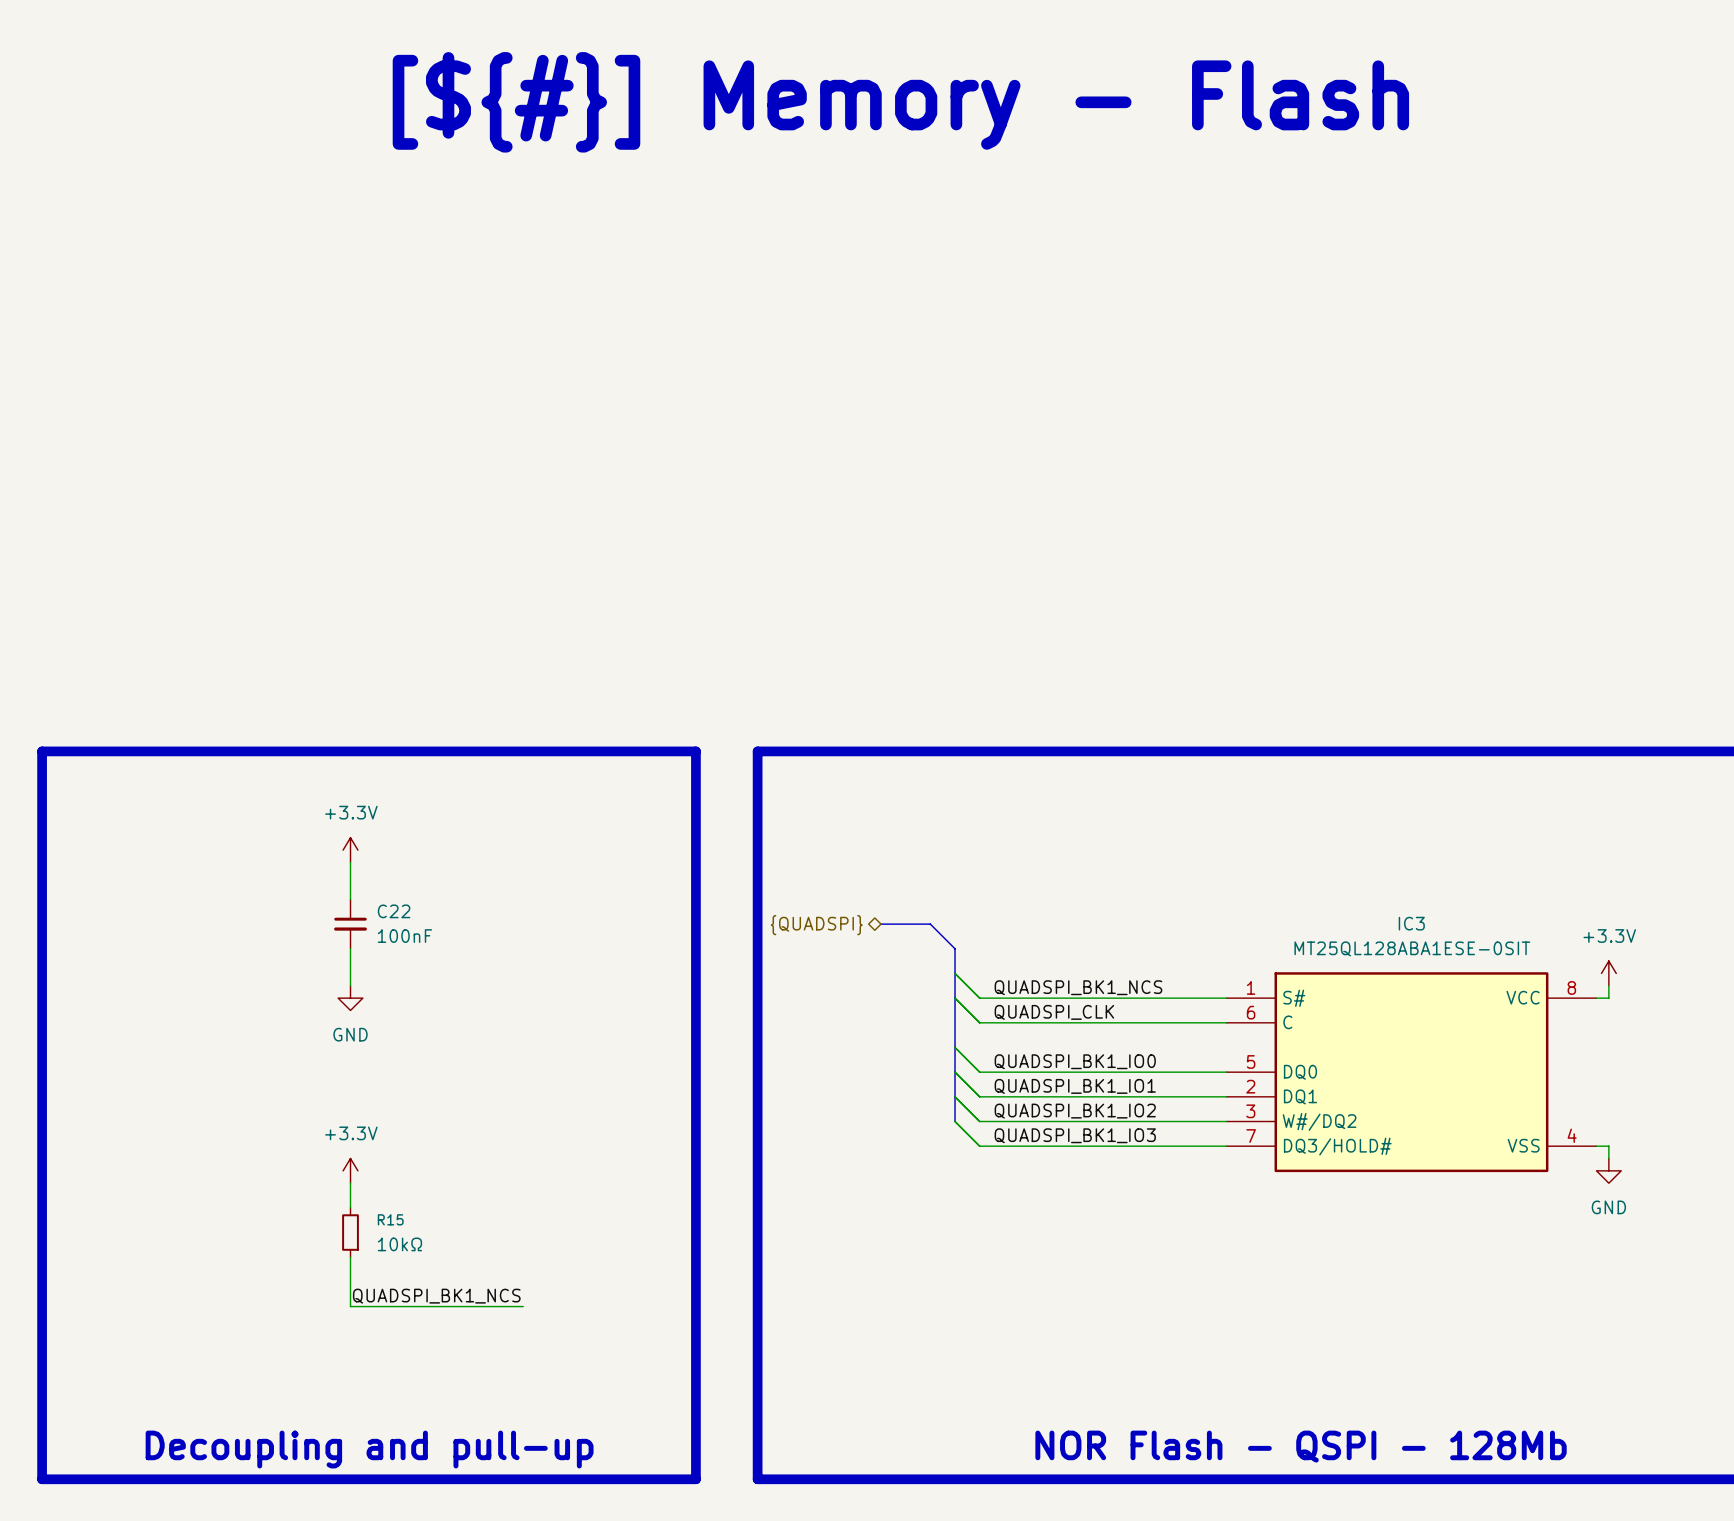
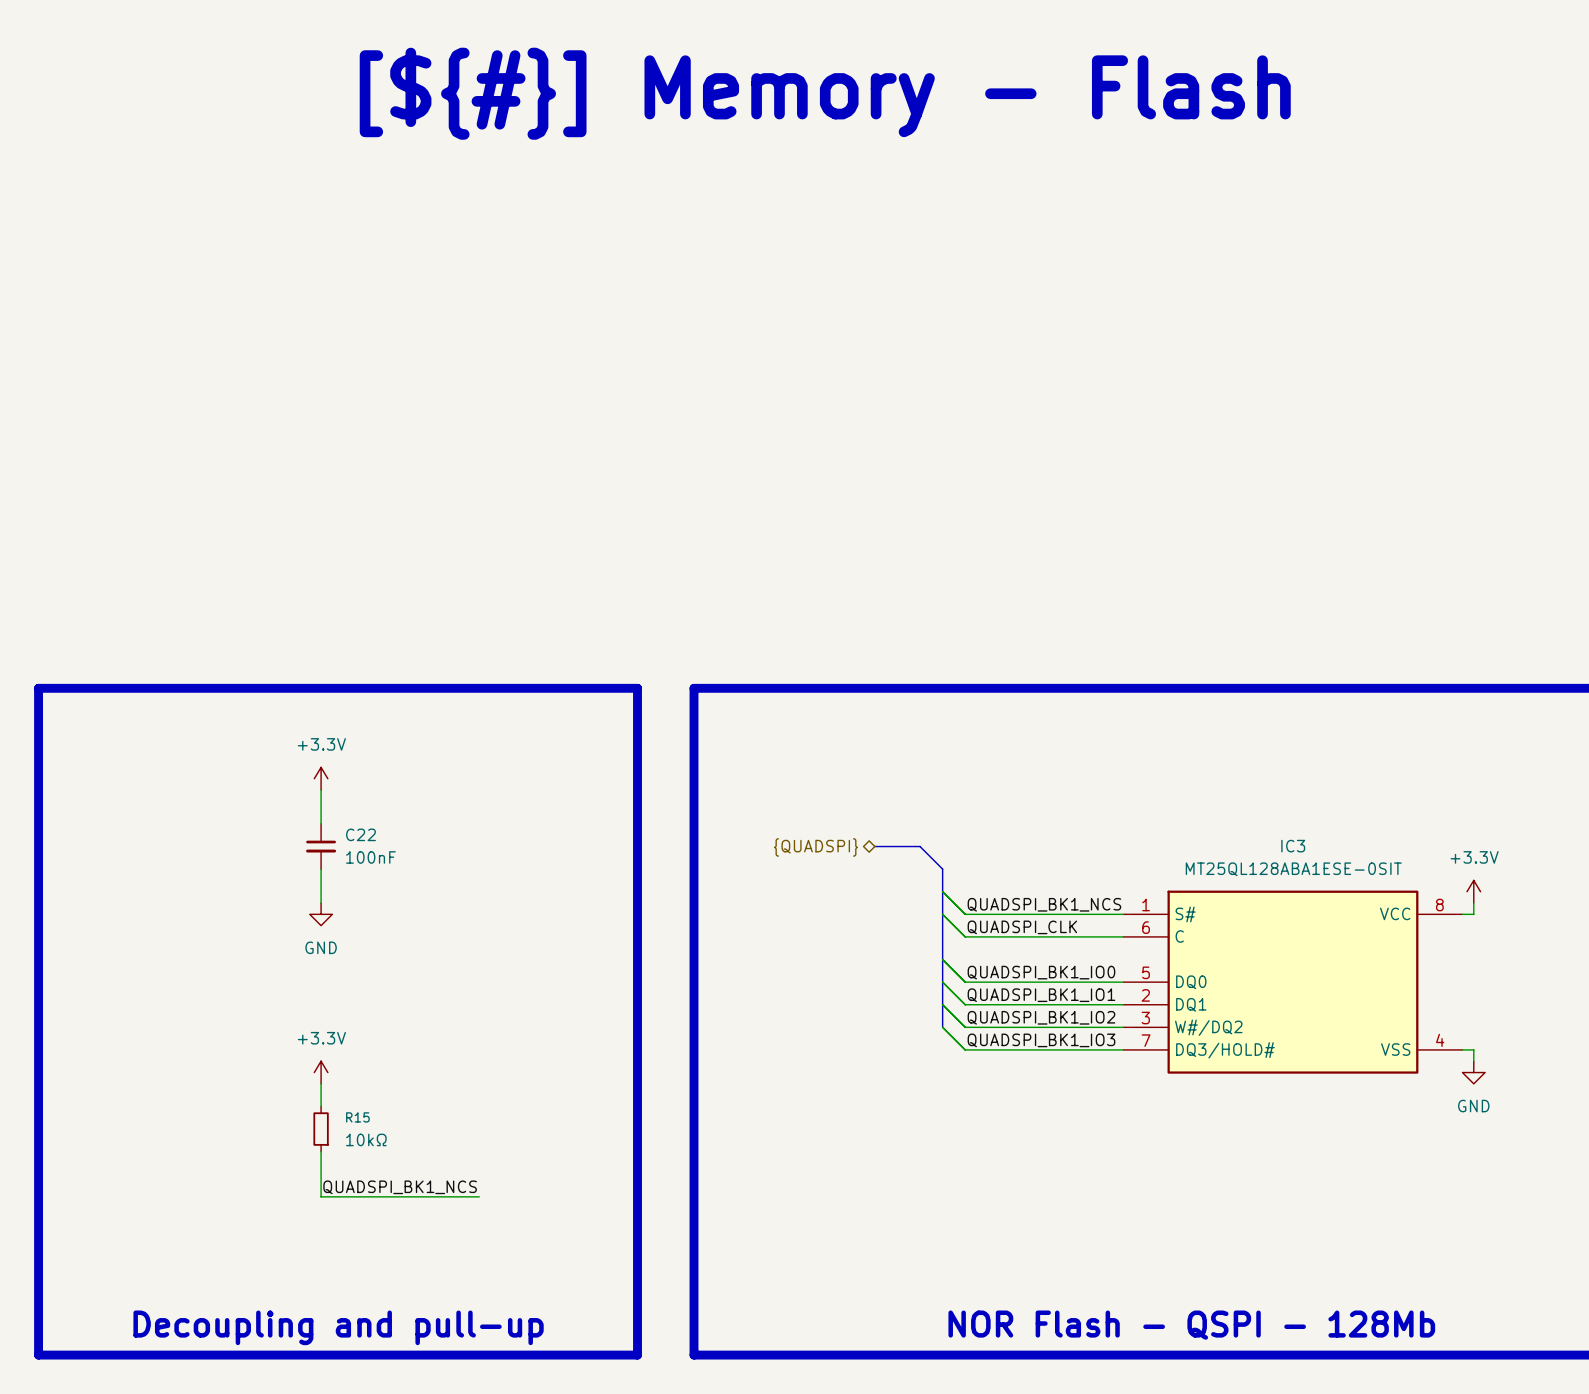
bus: (880, 924) (930, 924) (955, 948) (955, 1121) -> (874, 846) (920, 846) (942, 869) (942, 1027)
hierarchical label position: {QUADSPI} (816, 925) -> {QUADSPI} (815, 847)
wire: (955, 973) (979, 998) (1053, 998) -> (942, 891) (965, 914)
label position: QUADSPI_BK1_NCS (1078, 987) -> QUADSPI_BK1_NCS (1044, 904)
wire: (955, 998) (979, 1022) (1053, 1022) -> (942, 914) (965, 936)
label position: QUADSPI_CLK (1054, 1012) -> QUADSPI_CLK (1022, 927)
wire: (955, 1047) (979, 1072) (1053, 1072) -> (942, 959) (965, 982)
label position: QUADSPI_BK1_IO0 (1075, 1061) -> QUADSPI_BK1_IO0 (1041, 972)
wire: (955, 1072) (979, 1096) (1053, 1096) -> (942, 982) (965, 1004)
label position: QUADSPI_BK1_IO1 (1075, 1086) -> QUADSPI_BK1_IO1 (1041, 995)
wire: (955, 1096) (979, 1121) (1053, 1121) -> (942, 1004) (965, 1027)
label position: QUADSPI_BK1_IO2 (1075, 1111) -> QUADSPI_BK1_IO2 (1041, 1017)
wire: (955, 1121) (979, 1146) (1053, 1146) -> (942, 1027) (965, 1049)
label position: QUADSPI_BK1_IO3 (1075, 1135) -> QUADSPI_BK1_IO3 (1041, 1040)

